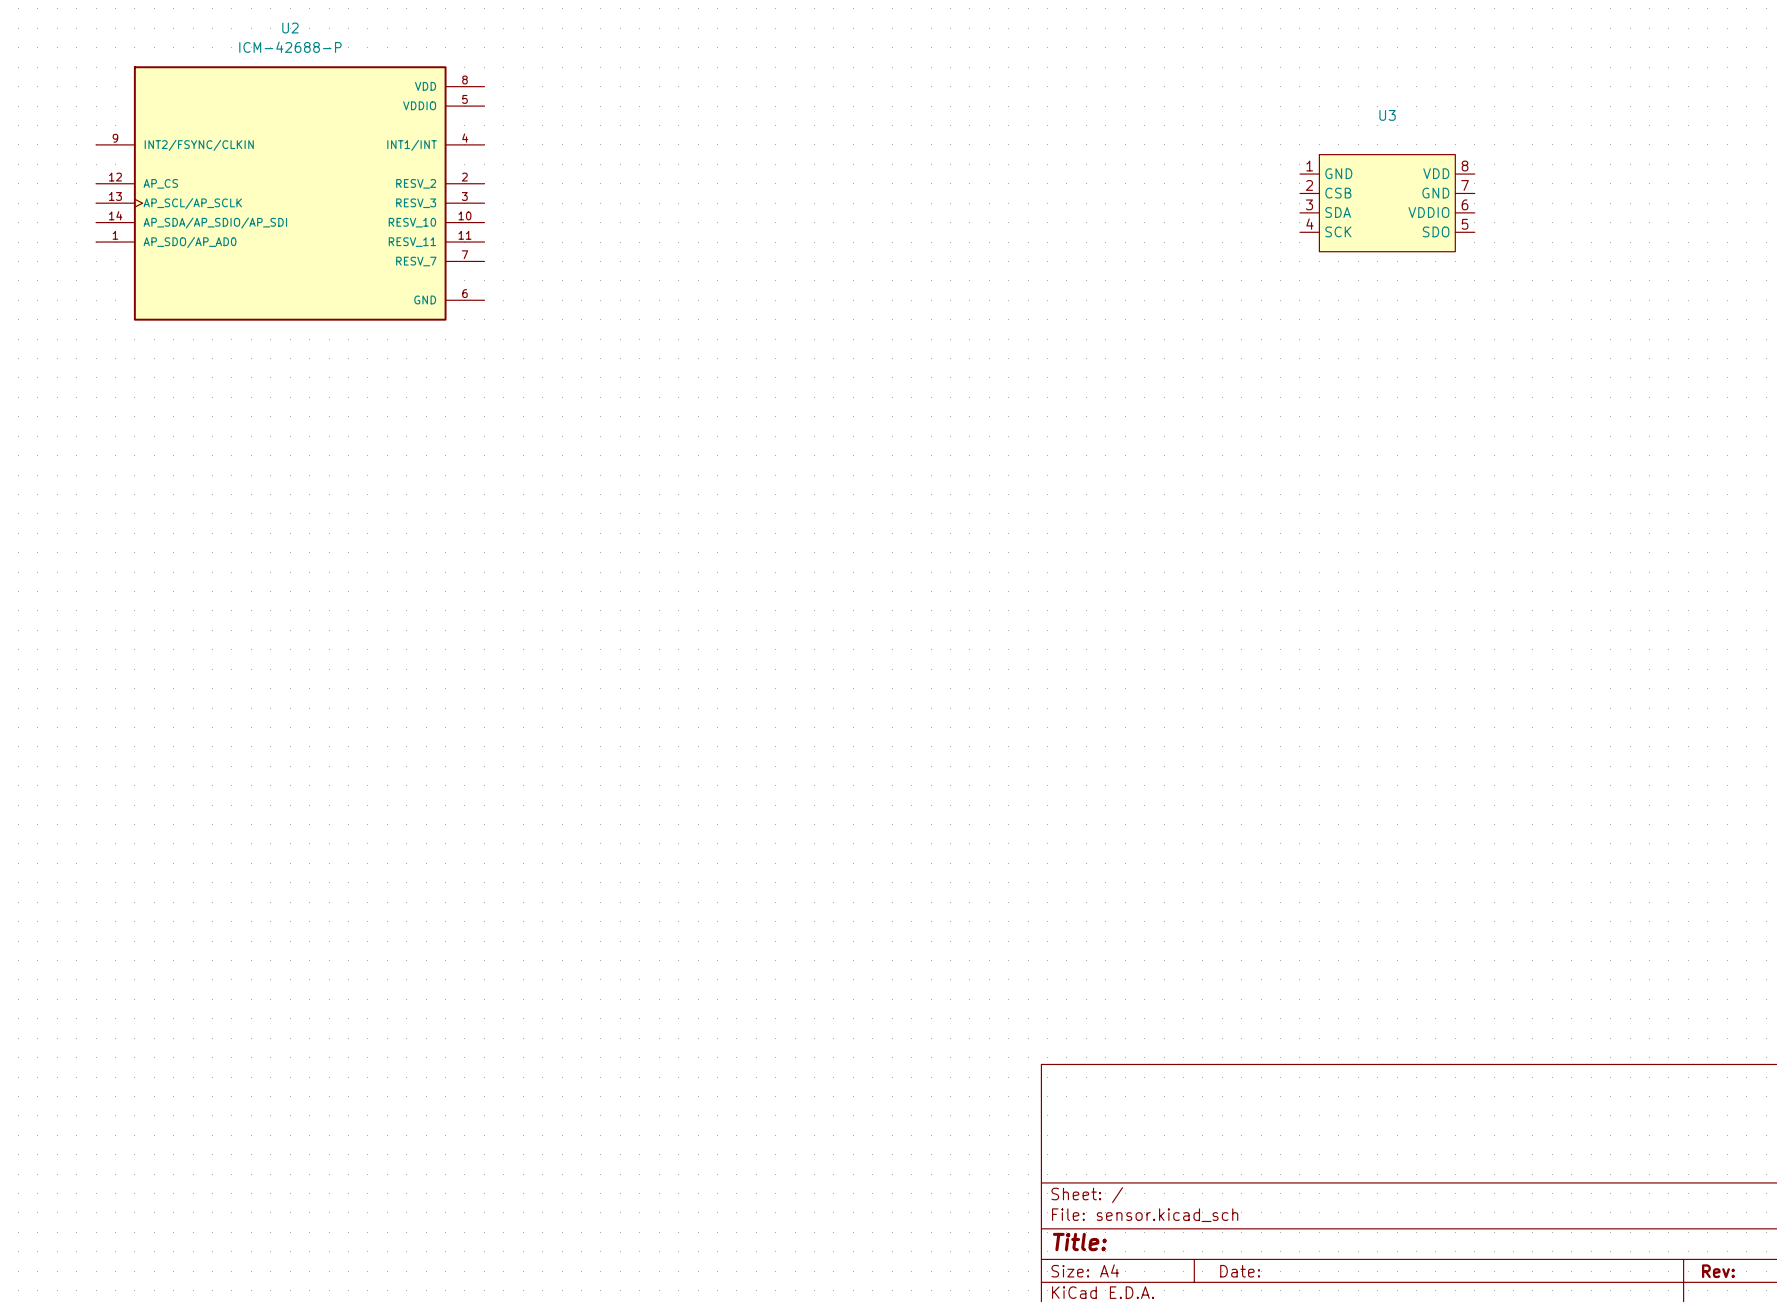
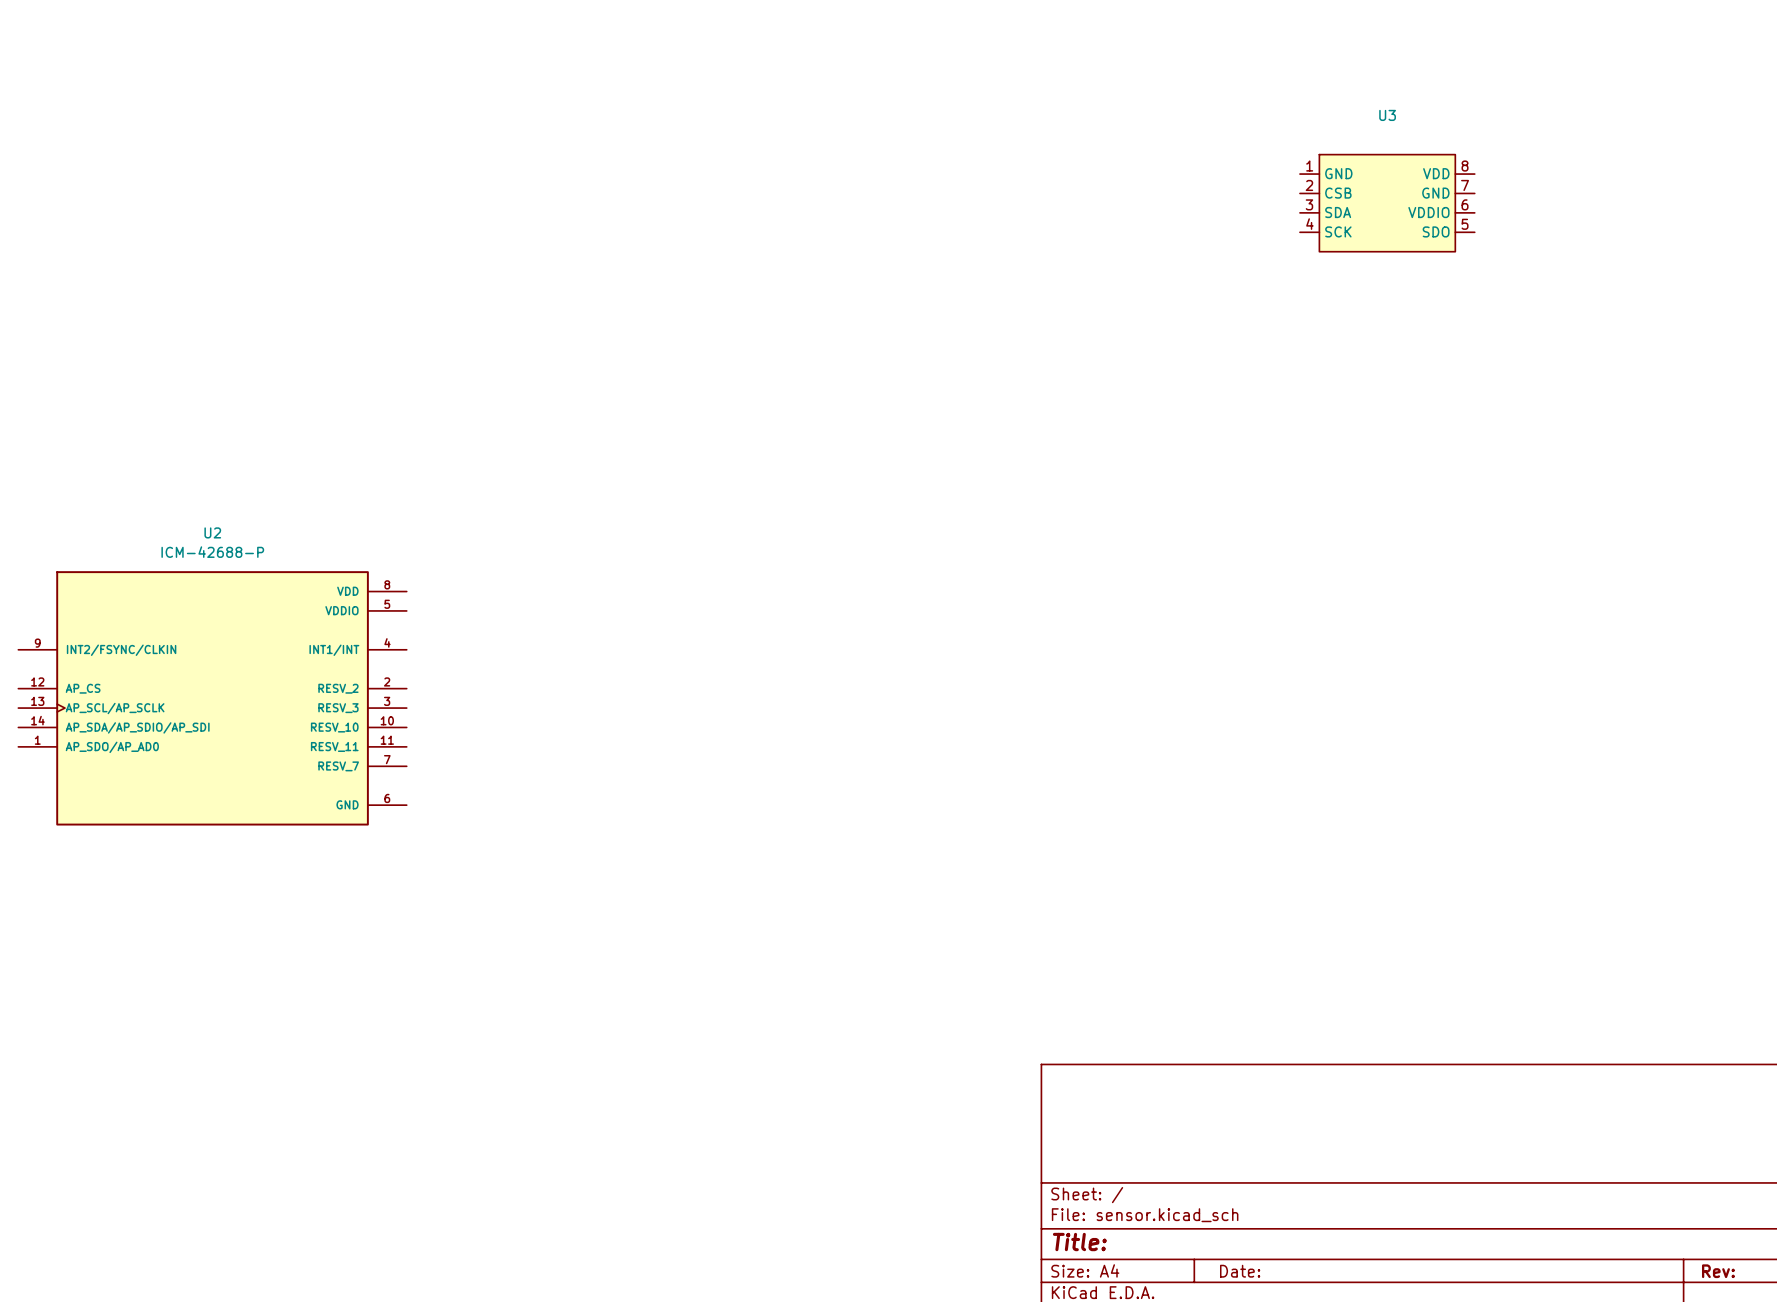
U2 position: (290, 193) -> (212, 698)

